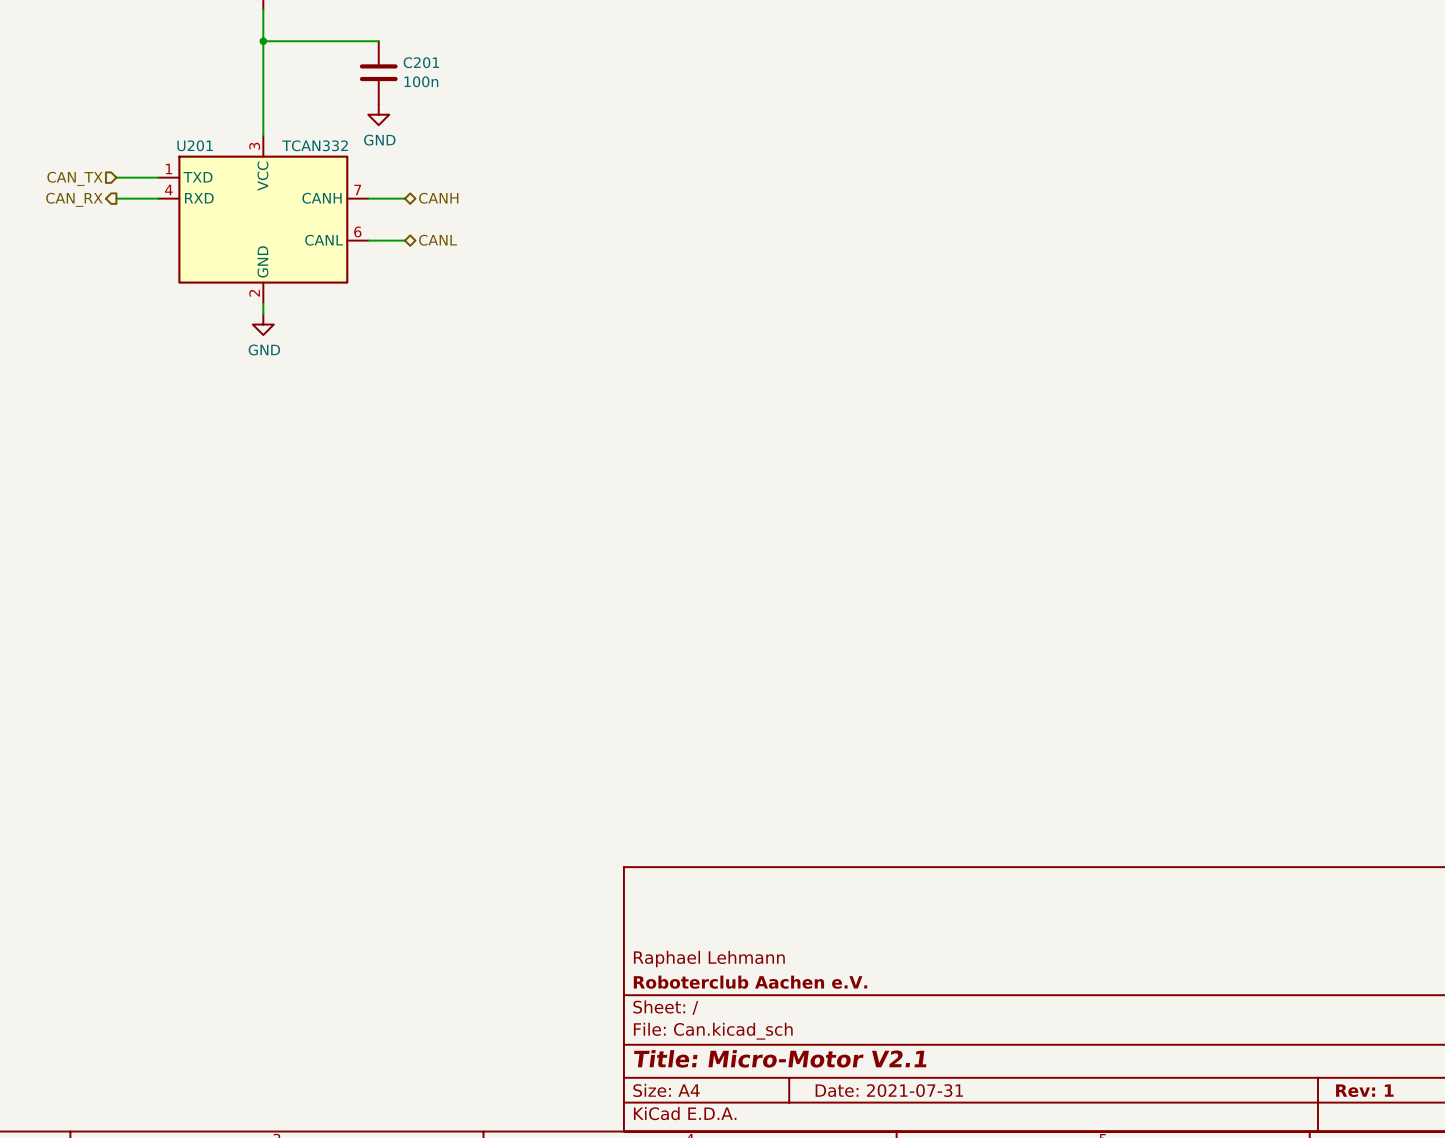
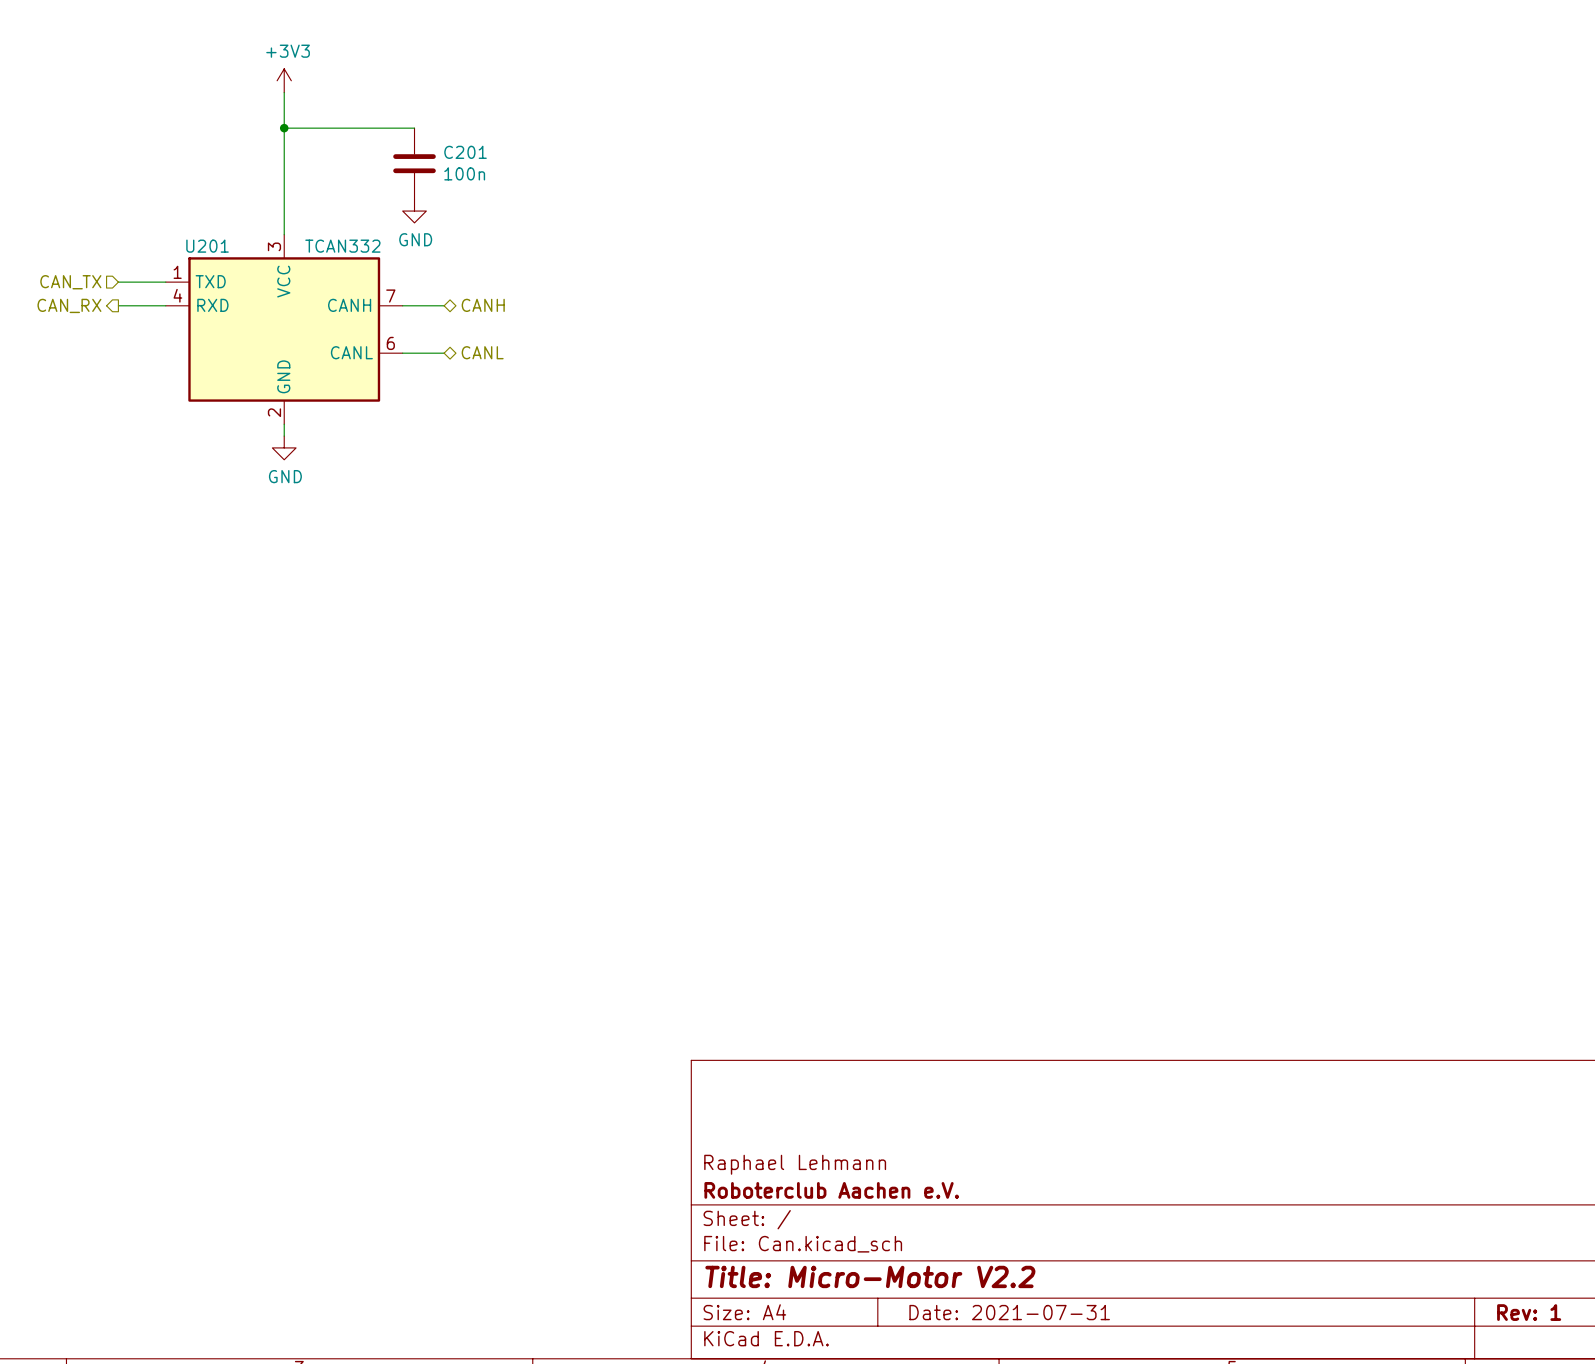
title block: Title: Micro-Motor V2.1 (780, 1058) -> Title: Micro-Motor V2.2 (870, 1276)

